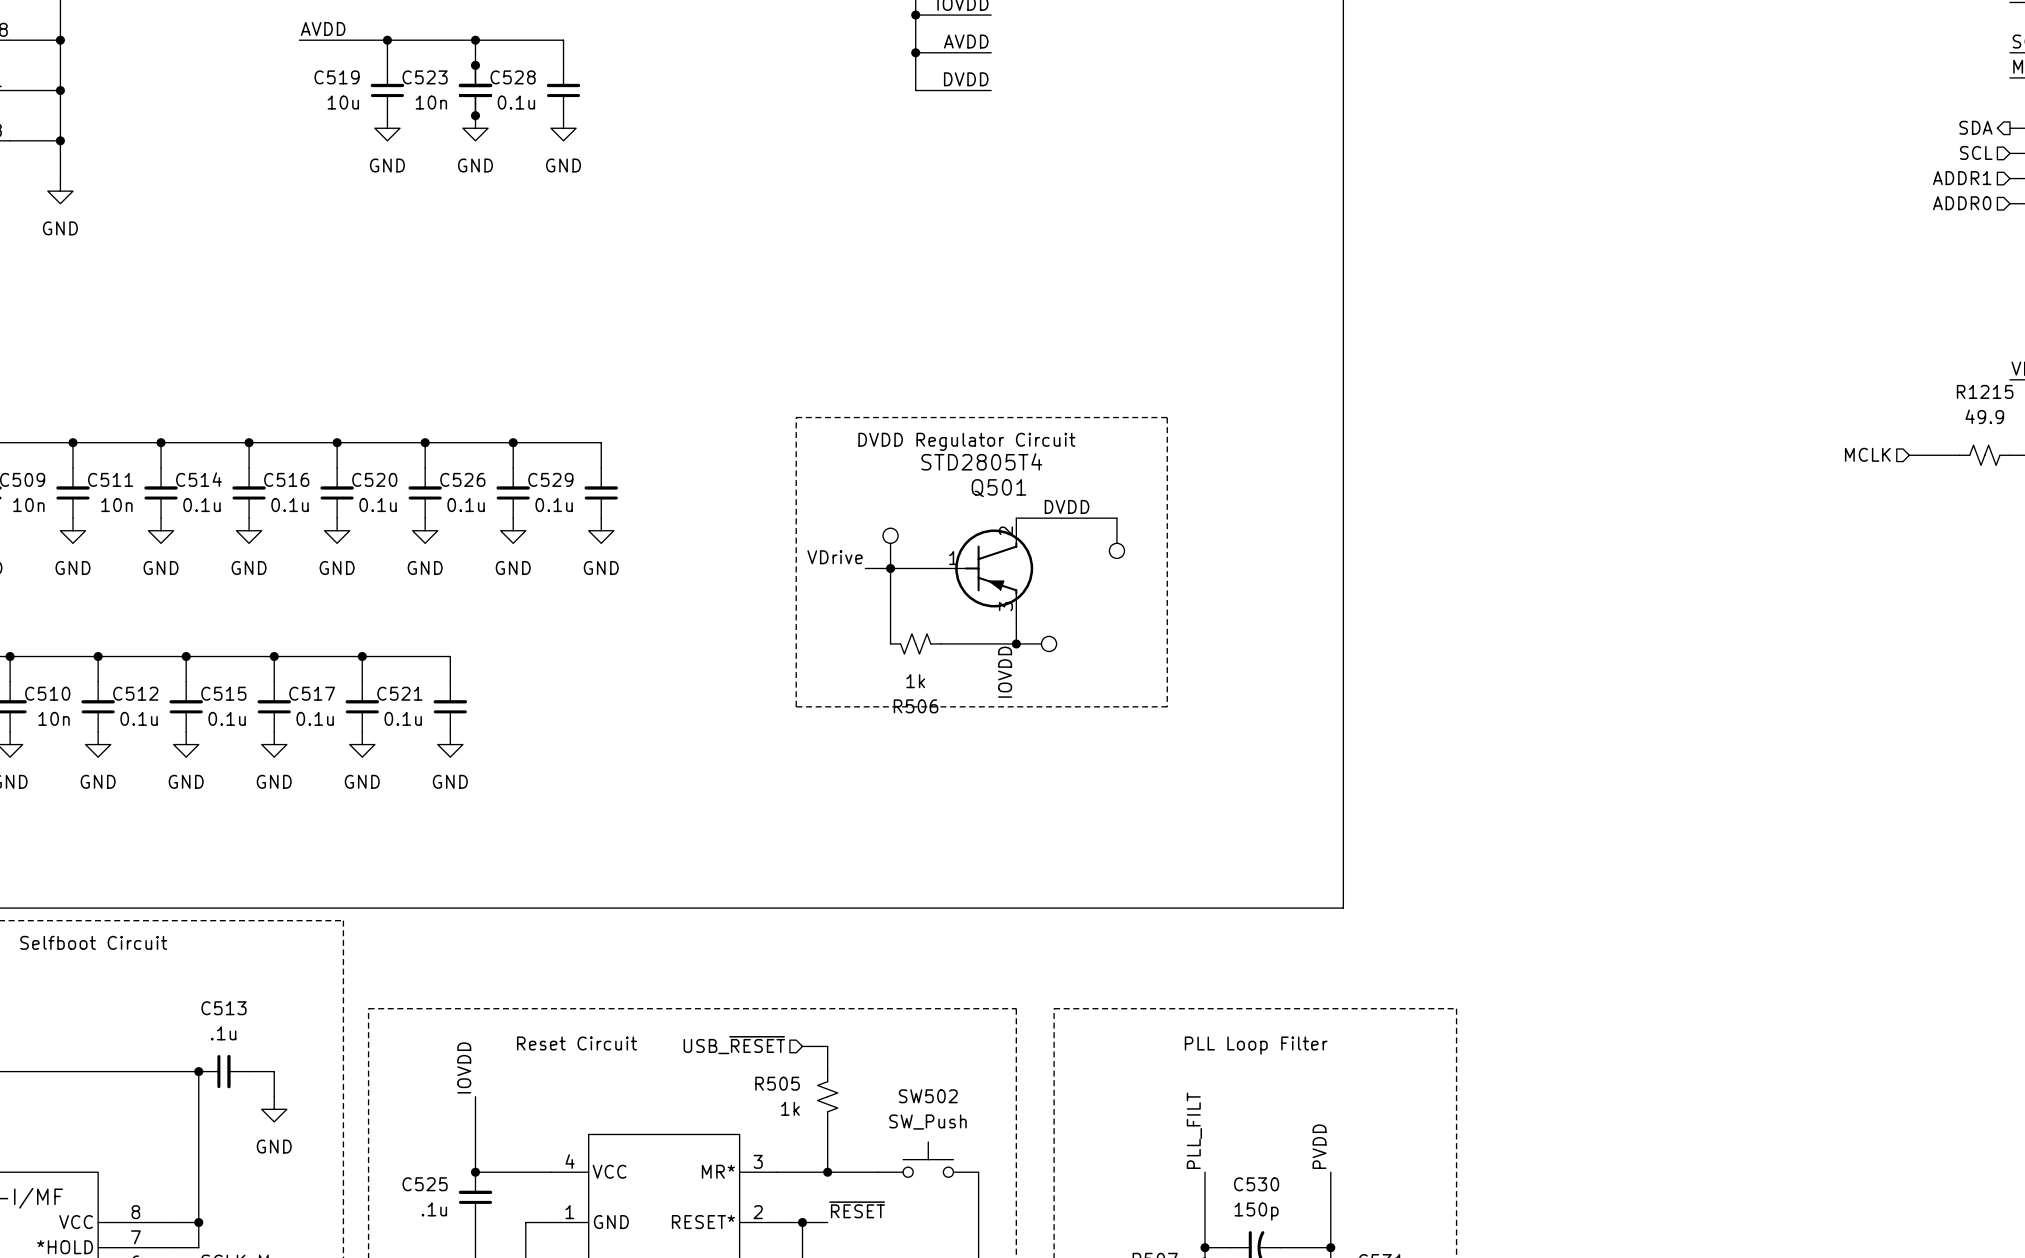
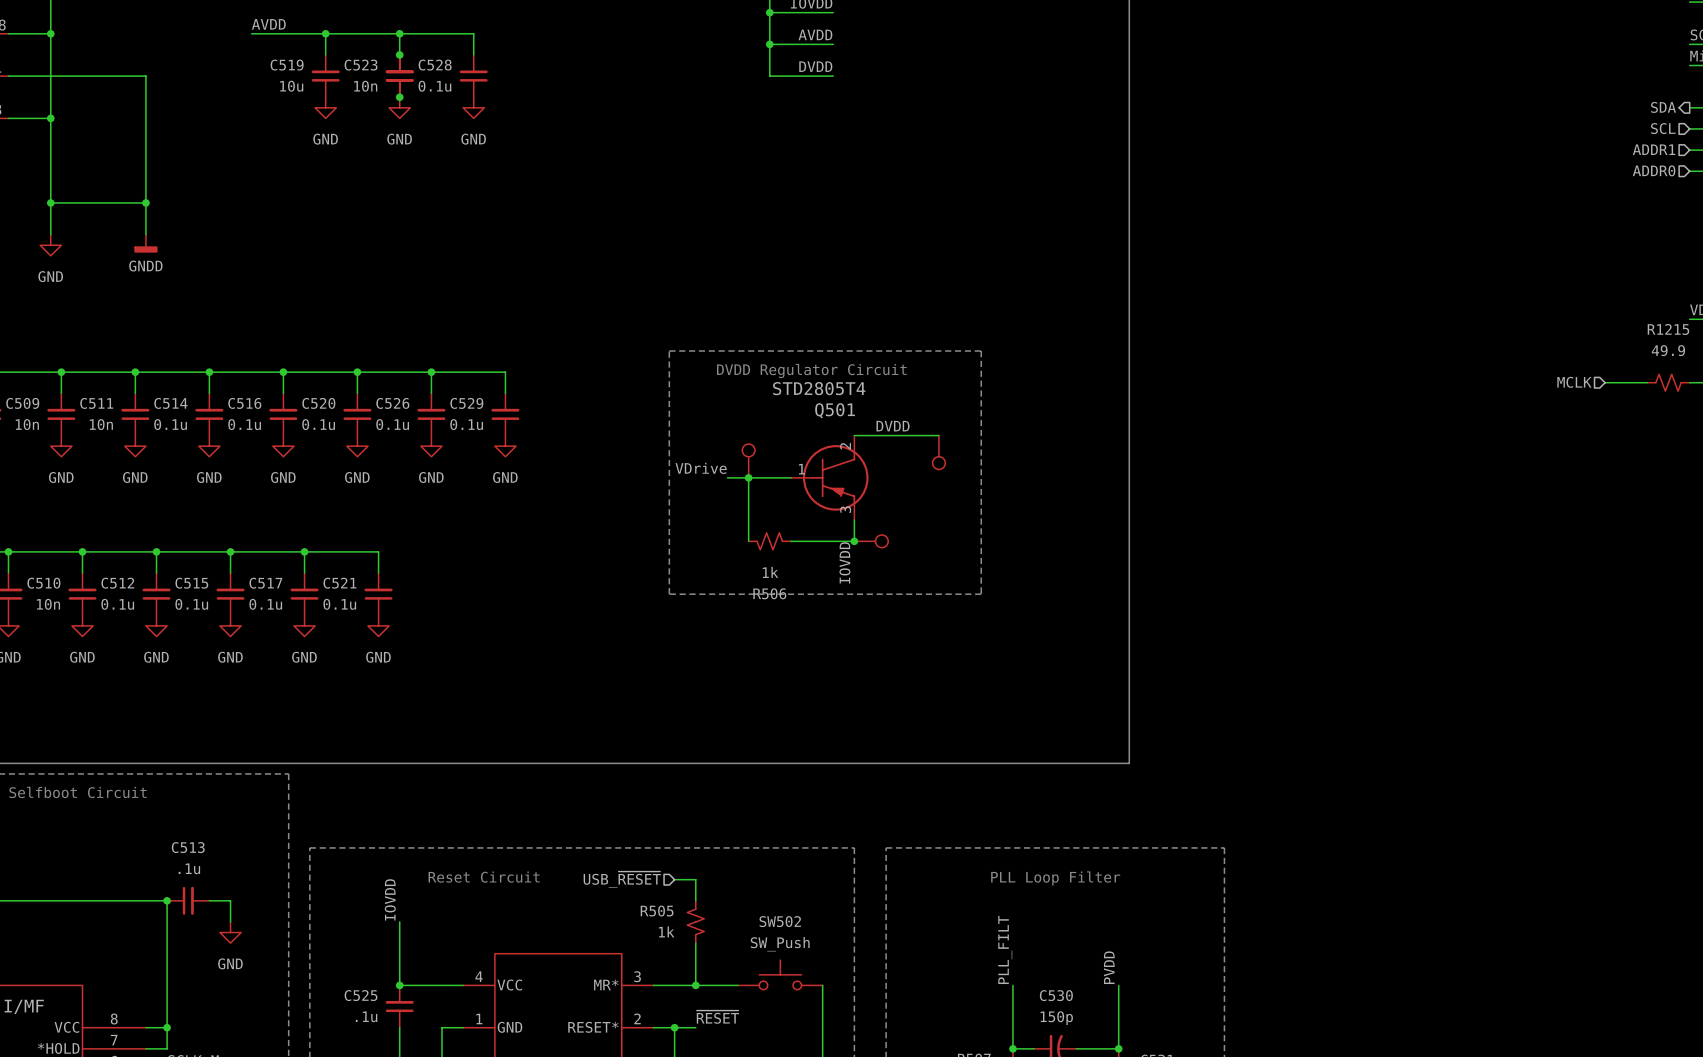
wire: none -> (50, 76) (145, 76) (145, 234)
junction: (60, 90) -> none
wire: none -> (50, 150) (50, 234)
power symbol position: GND (60, 191) -> GND (50, 245)
wire: none -> (50, 202) (145, 202)
junction: none -> (50, 202)
junction: none -> (145, 202)
power symbol: none -> GNDD (145, 243)

